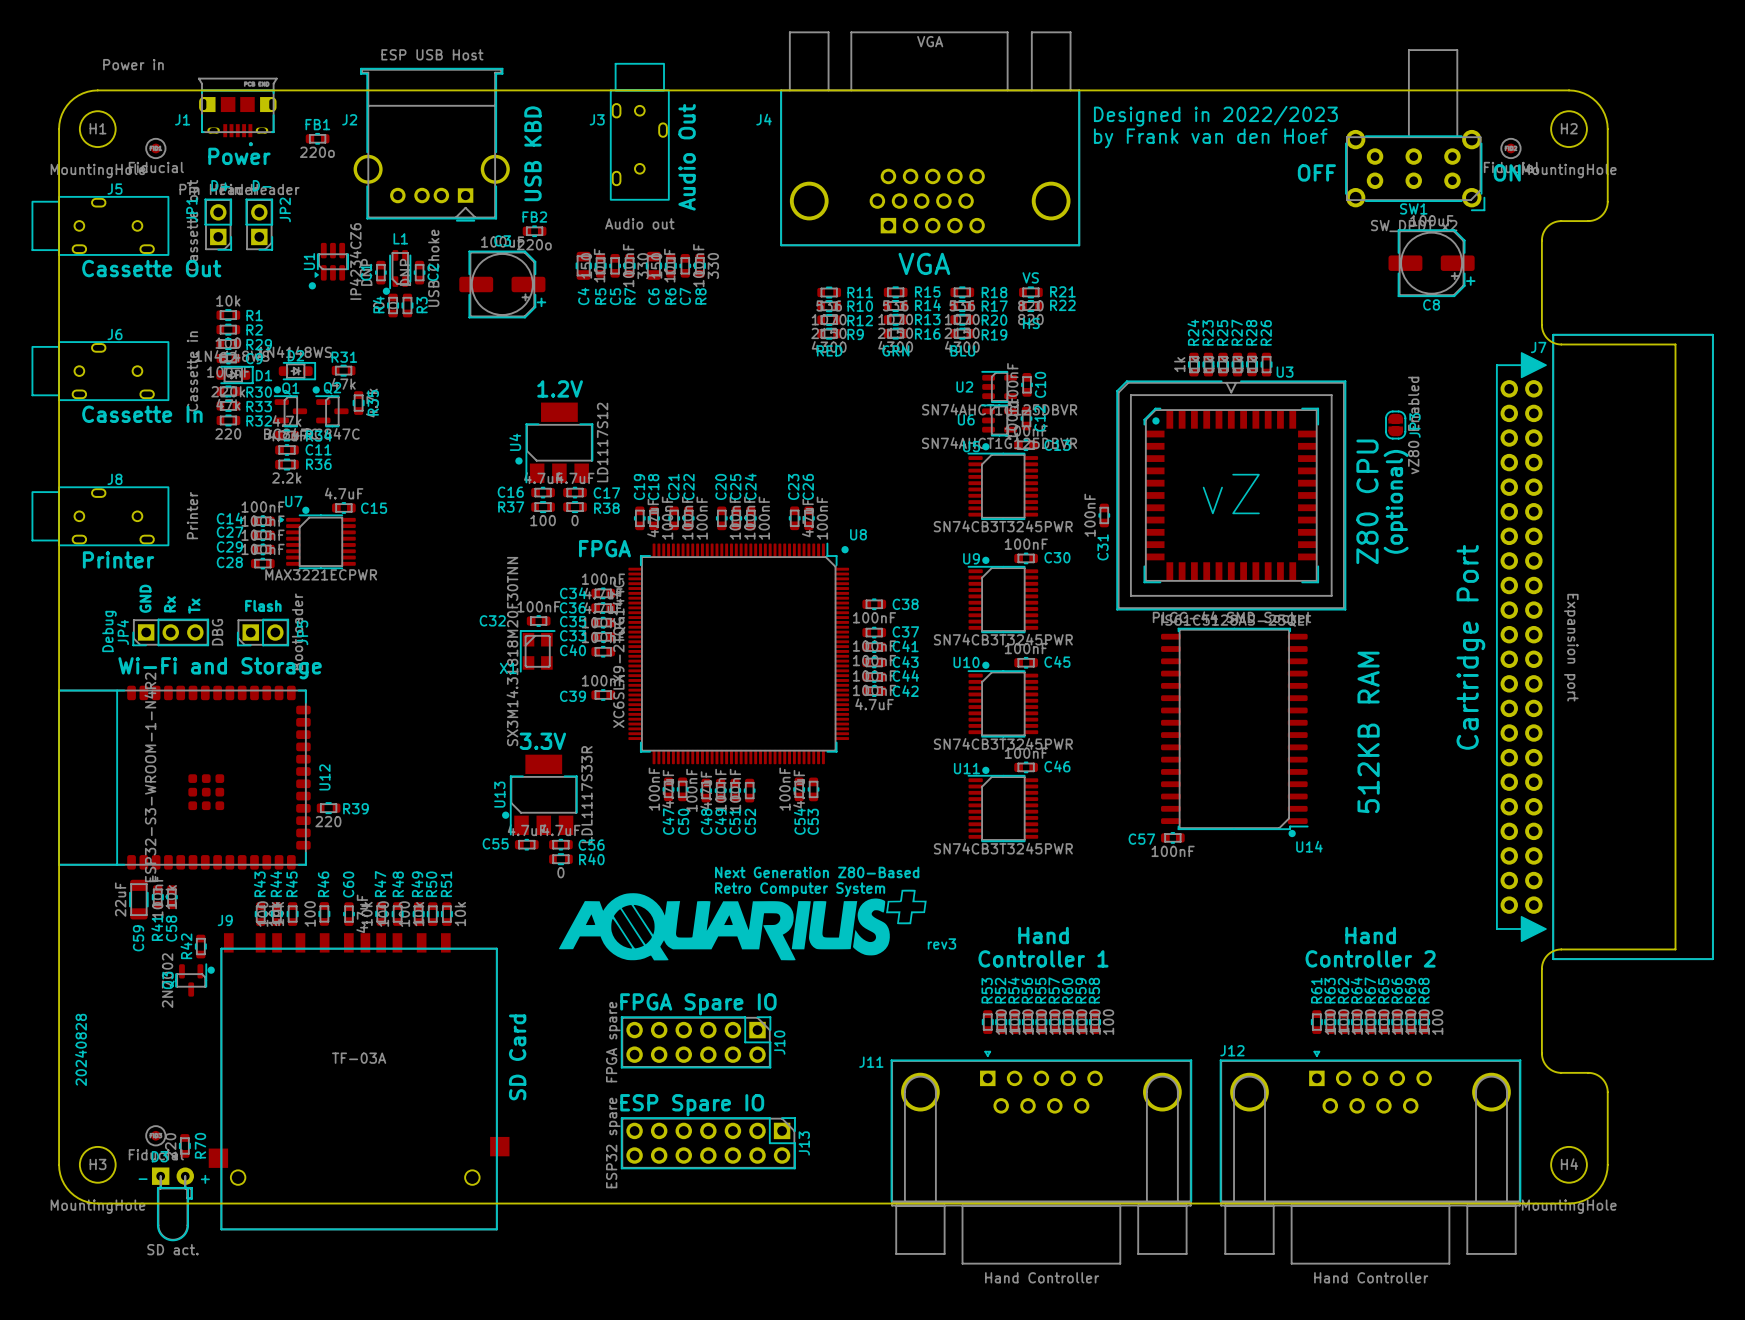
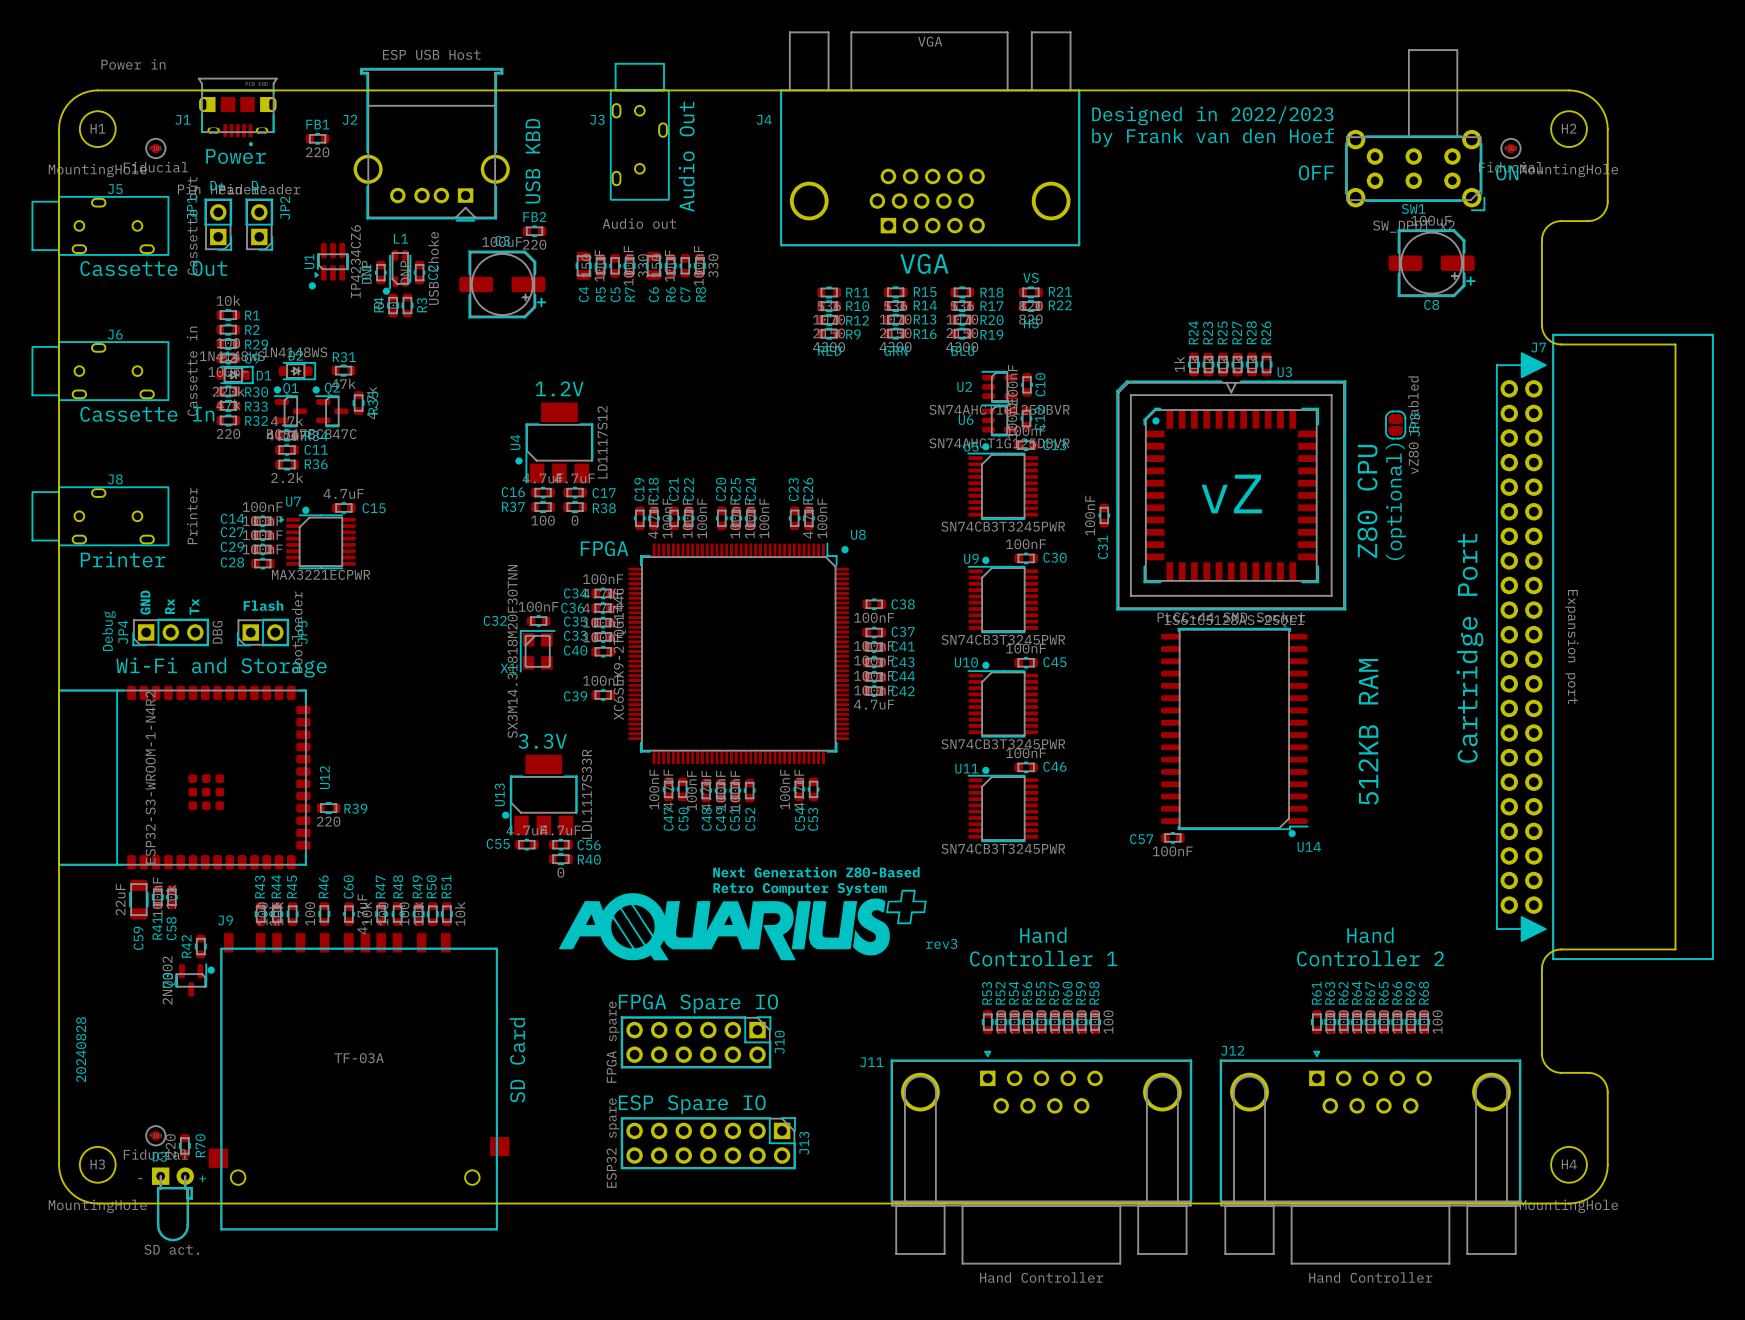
FB1 value: 220o (317, 152) -> 220 (317, 152)
FB2 value: 220o (534, 244) -> 220 (534, 244)

